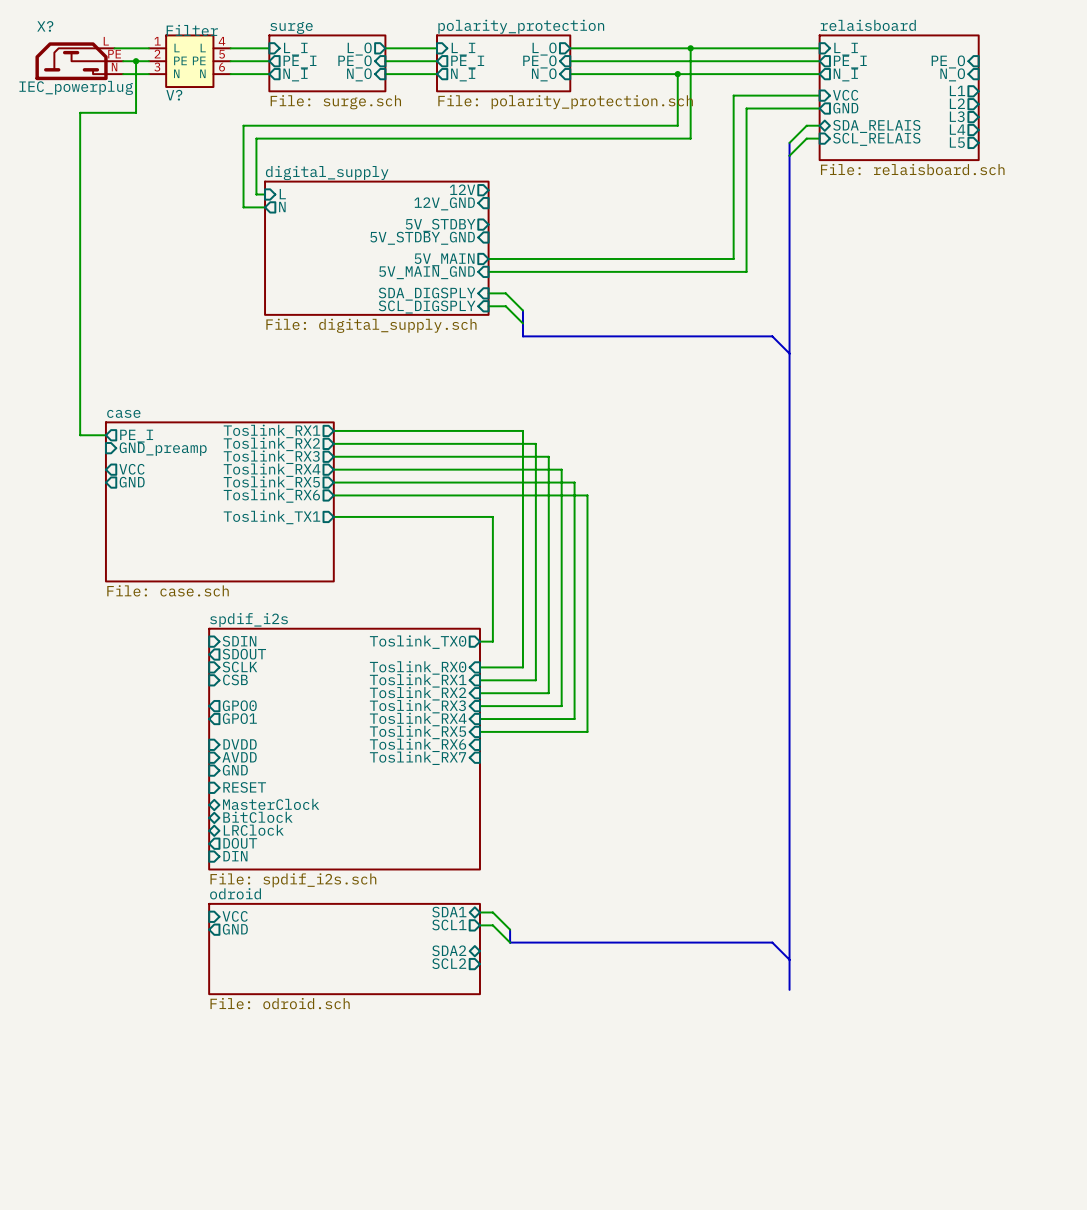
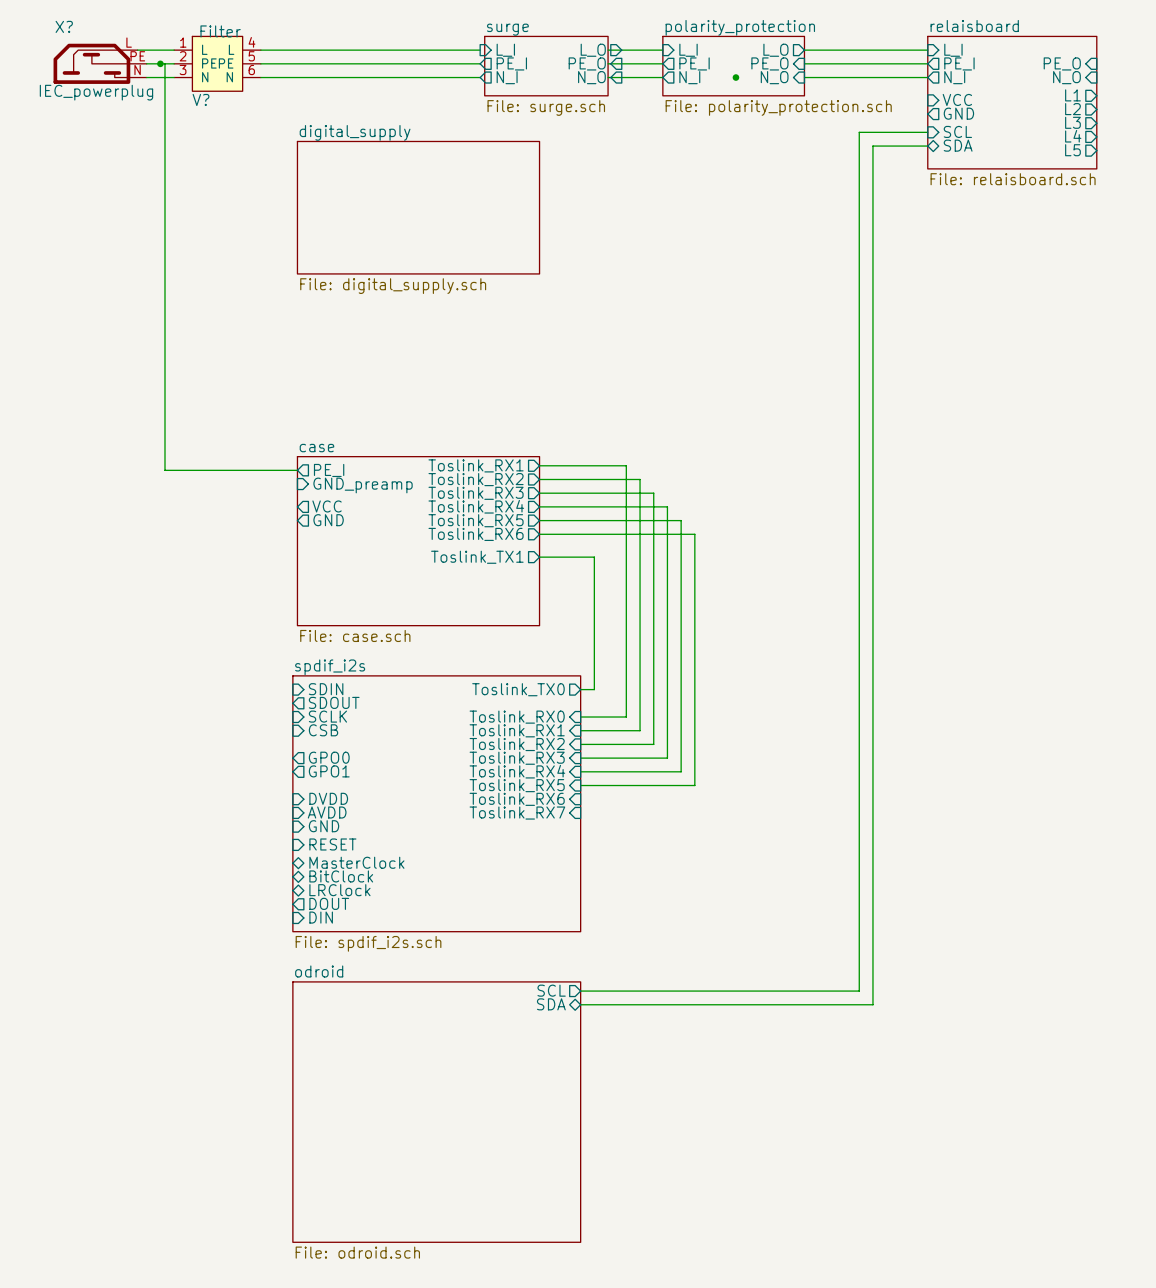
wire: none -> (302, 50) (425, 50)
wire: none -> (608, 50) (621, 50)
wire: (608, 48) (742, 48) -> none
wire: (690, 48) (690, 138) (256, 138) (256, 194) (265, 194) -> none
junction: (690, 48) -> none
wire: none -> (886, 50) (927, 50)
sheet pin: L_I (295, 49) -> none
sheet pin: L_O (359, 49) -> none
sheet pin: none -> L_I (688, 50)
sheet pin: none -> L_O (775, 50)
sheet pin position: L_I (846, 49) -> L_I (953, 50)
wire: (136, 61) (136, 112) (80, 112) (80, 435) (105, 435) -> none
wire: none -> (164, 63) (164, 470) (297, 470)
wire: none -> (302, 63) (425, 63)
sheet pin: PE_O (355, 61) -> none
wire: none -> (608, 63) (621, 63)
wire: (608, 61) (742, 61) -> none
sheet pin: none -> PE_O (769, 63)
wire: none -> (886, 63) (927, 63)
sheet pin position: PE_O (948, 61) -> PE_O (1062, 63)
sheet pin: PE_I (300, 62) -> none
sheet pin: none -> PE_I (694, 63)
sheet pin position: PE_I (850, 62) -> PE_I (959, 63)
sheet surge: File: surge.sch (327, 63) -> none
sheet surge: none -> File: surge.sch (546, 66)
sheet polarity_protection: File: polarity_protection.sch (503, 63) -> none
sheet polarity_protection: none -> File: polarity_protection.sch (733, 66)
wire: none -> (302, 77) (425, 77)
sheet pin: N_I (295, 74) -> none
sheet pin: N_O (359, 74) -> none
wire: none -> (608, 77) (621, 77)
wire: (608, 74) (742, 74) -> none
sheet pin: none -> N_I (689, 77)
wire: (677, 74) (677, 125) (243, 125) (243, 207) (265, 207) -> none
sheet pin: none -> N_O (774, 77)
wire: none -> (886, 77) (927, 77)
sheet pin position: N_I (845, 74) -> N_I (954, 77)
sheet pin position: N_O (952, 74) -> N_O (1066, 77)
sheet pin position: L1 (957, 90) -> L1 (1072, 95)
wire: (819, 95) (733, 95) (733, 258) (488, 258) -> none
sheet pin position: VCC (845, 95) -> VCC (957, 99)
sheet relaisboard position: (899, 97) -> (1012, 102)
sheet pin position: L2 (957, 103) -> L2 (1072, 109)
wire: (819, 108) (746, 108) (746, 271) (488, 271) -> none
sheet pin position: GND (845, 108) -> GND (958, 113)
sheet pin position: L3 (957, 116) -> L3 (1072, 122)
wire: (806, 125) (789, 142) -> (872, 132) (859, 132) (859, 991) (580, 991)
wire: none -> (886, 132) (927, 132)
sheet pin: none -> SCL (957, 131)
sheet pin: SDA_RELAIS (876, 126) -> none
sheet pin position: L4 (957, 129) -> L4 (1073, 136)
wire: (806, 138) (789, 155) -> (872, 146) (872, 1004) (580, 1004)
wire: none -> (886, 146) (927, 146)
sheet pin: none -> SDA (958, 145)
sheet pin: SCL_RELAIS (876, 139) -> none
bus: (789, 142) (789, 989) -> none
sheet pin position: L5 (957, 142) -> L5 (1072, 150)
sheet pin: 12V (462, 189) -> none
sheet pin: L (282, 194) -> none
sheet digital_supply: none -> File: digital_supply.sch (418, 207)
sheet pin: 12V_GND (444, 203) -> none
sheet pin: N (282, 207) -> none
sheet pin: 5V_STDBY (440, 225) -> none
sheet pin: 5V_STDBY_GND (422, 238) -> none
sheet digital_supply: File: digital_supply.sch (376, 248) -> none
sheet pin: 5V_MAIN (444, 259) -> none
sheet pin: 5V_MAIN_GND (427, 272) -> none
wire: (488, 293) (505, 293) (522, 310) -> none
sheet pin: SDA_DIGSPLY (427, 294) -> none
wire: (488, 306) (505, 306) (522, 323) -> none
sheet pin: SCL_DIGSPLY (427, 307) -> none
bus: (522, 310) (522, 336) (772, 336) (789, 353) -> none
wire: (333, 430) (522, 430) (522, 667) (479, 667) -> none
sheet pin: Toslink_RX1 (271, 431) -> none
sheet pin position: PE_I (136, 436) -> PE_I (329, 470)
sheet pin: none -> Toslink_RX1 (476, 465)
wire: (333, 443) (535, 443) (535, 680) (479, 680) -> none
sheet pin: Toslink_RX2 (271, 444) -> none
sheet pin position: GND_preamp (163, 449) -> GND_preamp (363, 485)
sheet pin: none -> Toslink_RX2 (476, 479)
wire: (333, 456) (548, 456) (548, 693) (479, 693) -> none
sheet pin: Toslink_RX3 (271, 457) -> none
sheet pin: none -> Toslink_RX3 (476, 493)
wire: none -> (539, 493) (653, 493) (653, 744) (580, 744)
sheet pin position: VCC (131, 469) -> VCC (327, 506)
wire: (333, 469) (561, 469) (561, 706) (479, 706) -> none
sheet pin: Toslink_RX4 (272, 470) -> none
sheet pin: none -> Toslink_RX4 (476, 506)
wire: none -> (539, 506) (667, 506) (667, 758) (580, 758)
sheet pin: GND (132, 482) -> none
wire: (333, 482) (574, 482) -> (539, 465) (626, 465) (626, 511)
sheet pin: Toslink_RX5 (271, 483) -> none
sheet pin: none -> GND (328, 520)
sheet pin: none -> Toslink_RX5 (476, 520)
wire: none -> (539, 520) (681, 520) (681, 771) (580, 771)
sheet pin: Toslink_RX6 (271, 495) -> none
wire: (333, 495) (587, 495) -> (539, 479) (640, 479) (640, 525)
sheet case position: (219, 501) -> (418, 541)
sheet pin: none -> Toslink_RX6 (476, 534)
wire: none -> (539, 534) (694, 534) (694, 785) (580, 785)
wire: (333, 516) (492, 516) (492, 641) (479, 641) -> none
sheet pin position: Toslink_TX1 (271, 517) -> Toslink_TX1 (477, 557)
wire: none -> (539, 557) (594, 557) (594, 689) (580, 689)
sheet pin position: SDIN (239, 641) -> SDIN (326, 689)
sheet pin position: Toslink_TX0 (418, 642) -> Toslink_TX0 (518, 689)
sheet pin position: SDOUT (244, 654) -> SDOUT (334, 702)
sheet pin position: SCLK (239, 667) -> SCLK (327, 716)
sheet pin position: Toslink_RX0 (418, 667) -> Toslink_RX0 (517, 717)
wire: (574, 676) (574, 719) (479, 719) -> (626, 717) (580, 717)
sheet pin position: CSB (235, 679) -> CSB (323, 730)
sheet pin position: Toslink_RX1 (418, 680) -> Toslink_RX1 (517, 730)
wire: (587, 688) (587, 731) (479, 731) -> (640, 730) (580, 730)
sheet pin position: Toslink_RX2 (418, 693) -> Toslink_RX2 (517, 744)
sheet pin position: GPO0 (239, 705) -> GPO0 (329, 757)
sheet pin position: Toslink_RX3 (417, 706) -> Toslink_RX3 (517, 758)
sheet pin position: GPO1 (239, 718) -> GPO1 (329, 771)
sheet pin position: Toslink_RX4 (418, 719) -> Toslink_RX4 (517, 771)
sheet pin position: Toslink_RX5 (418, 732) -> Toslink_RX5 (517, 785)
sheet pin position: DVDD (240, 744) -> DVDD (328, 798)
sheet pin position: Toslink_RX6 (418, 745) -> Toslink_RX6 (517, 799)
sheet spdif_i2s position: (344, 749) -> (436, 803)
sheet pin position: AVDD (239, 757) -> AVDD (327, 812)
sheet pin position: Toslink_RX7 (417, 758) -> Toslink_RX7 (517, 813)
sheet pin position: GND (235, 770) -> GND (324, 826)
sheet pin position: RESET (244, 787) -> RESET (332, 844)
sheet pin position: MasterClock (271, 804) -> MasterClock (356, 862)
sheet pin position: BitClock (257, 817) -> BitClock (341, 876)
sheet pin position: LRClock (253, 830) -> LRClock (339, 890)
sheet pin position: DOUT (240, 843) -> DOUT (329, 903)
sheet pin position: DIN (235, 856) -> DIN (321, 917)
sheet pin: SDA1 (449, 912) -> none
wire: (479, 912) (492, 912) (510, 929) -> none
sheet pin: VCC (235, 916) -> none
sheet pin: SCL1 (449, 925) -> none
sheet pin: GND (235, 929) -> none
bus: (510, 929) (510, 942) (772, 942) (789, 959) -> none
sheet pin: none -> SCL (551, 990)
sheet pin: none -> SDA (551, 1004)
sheet odroid: File: odroid.sch (344, 949) -> none
sheet pin: SDA2 (449, 950) -> none
sheet pin: SCL2 (449, 963) -> none
sheet odroid: none -> File: odroid.sch (436, 1112)

